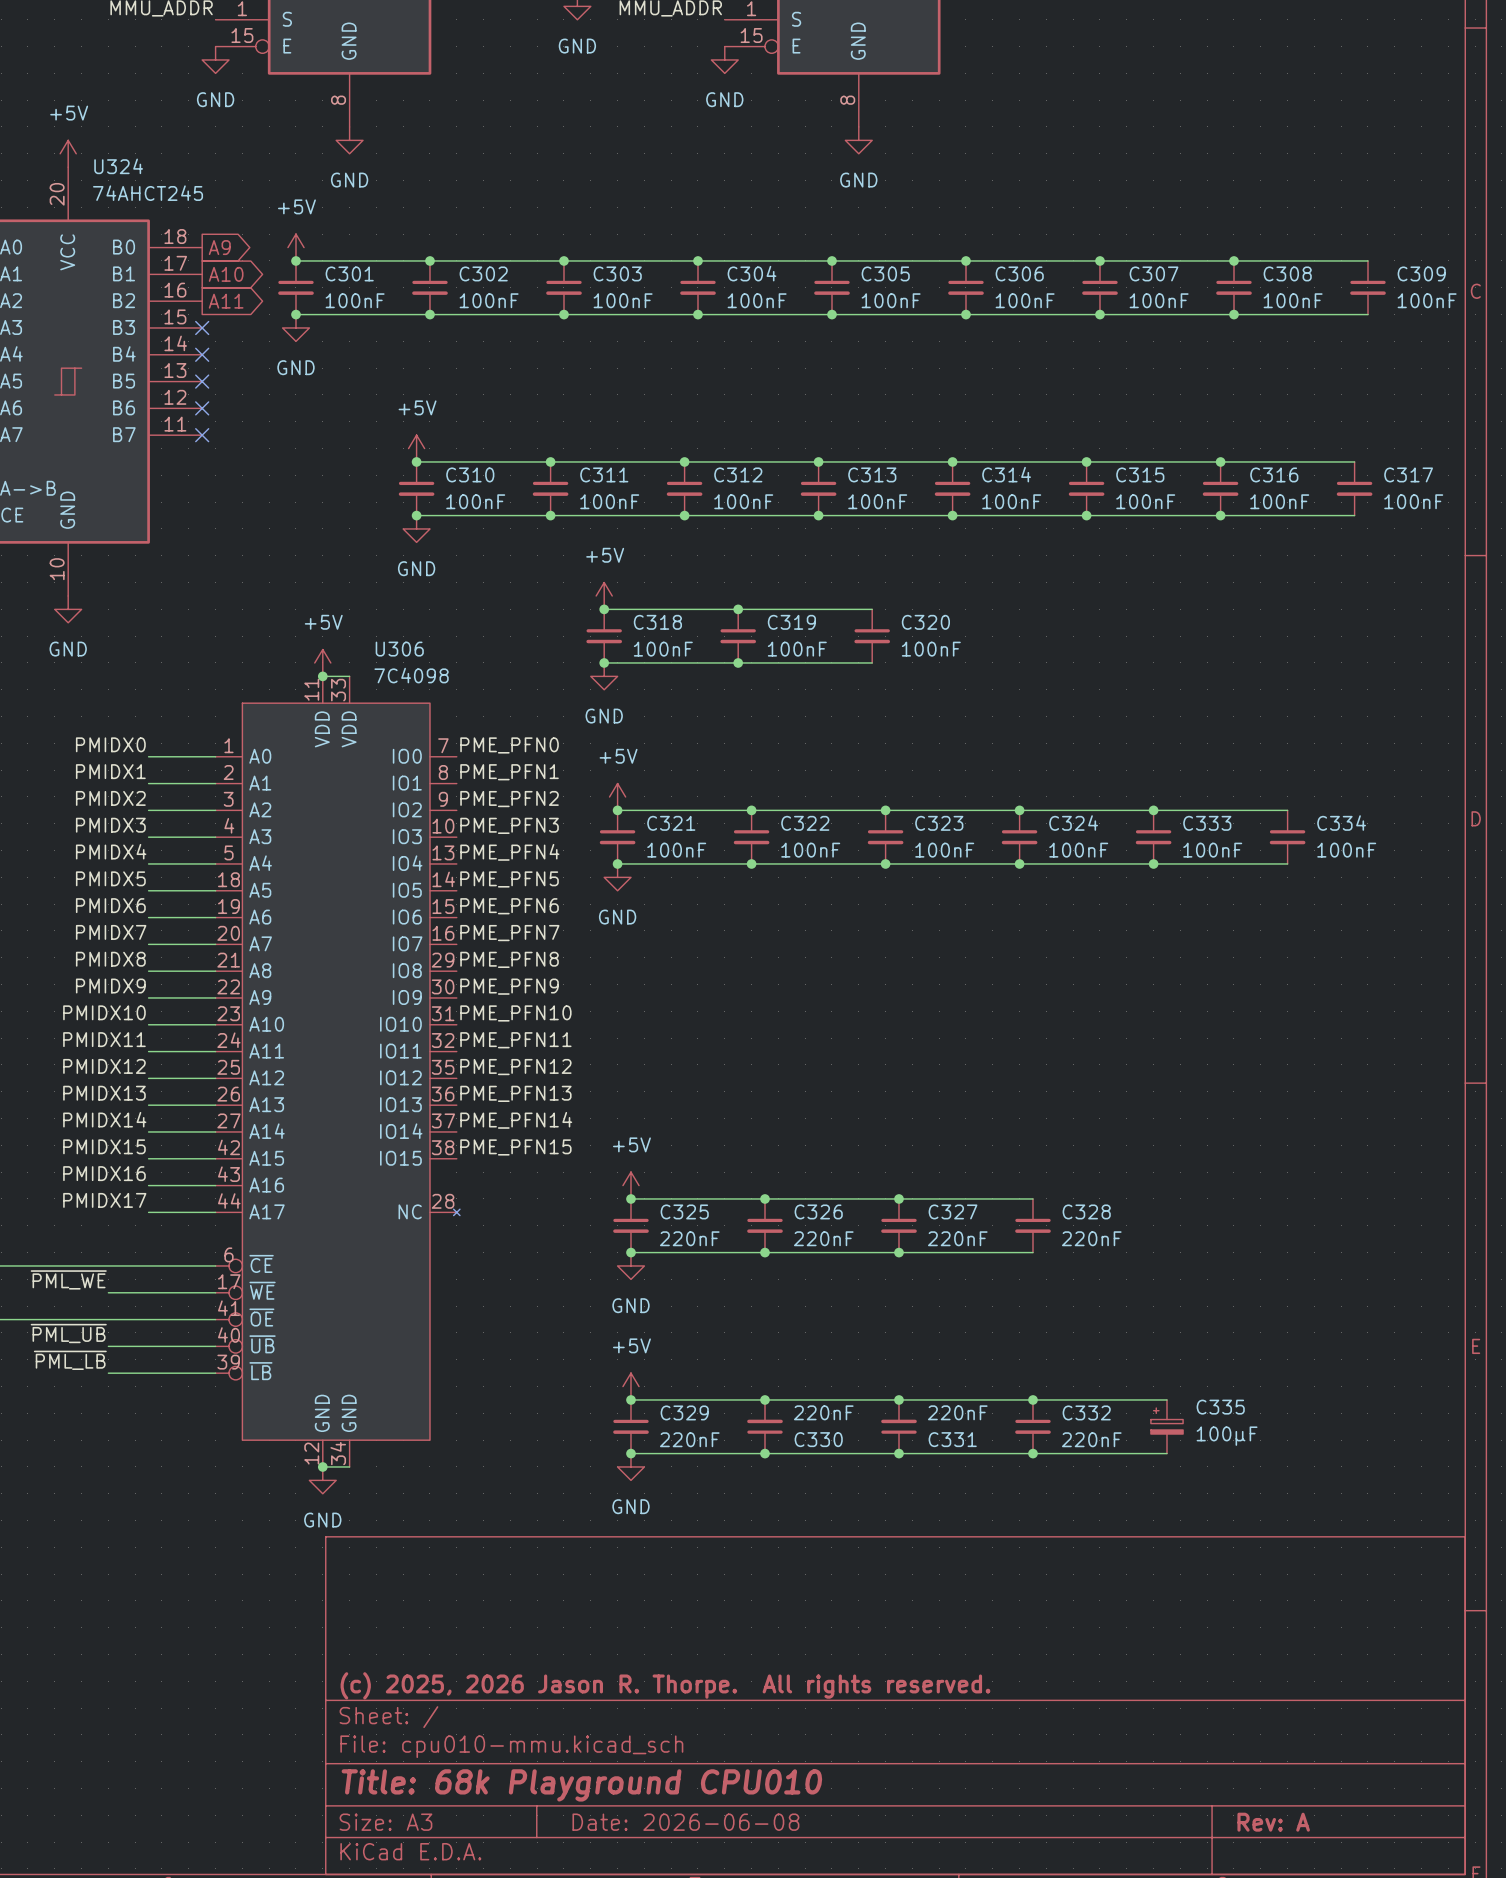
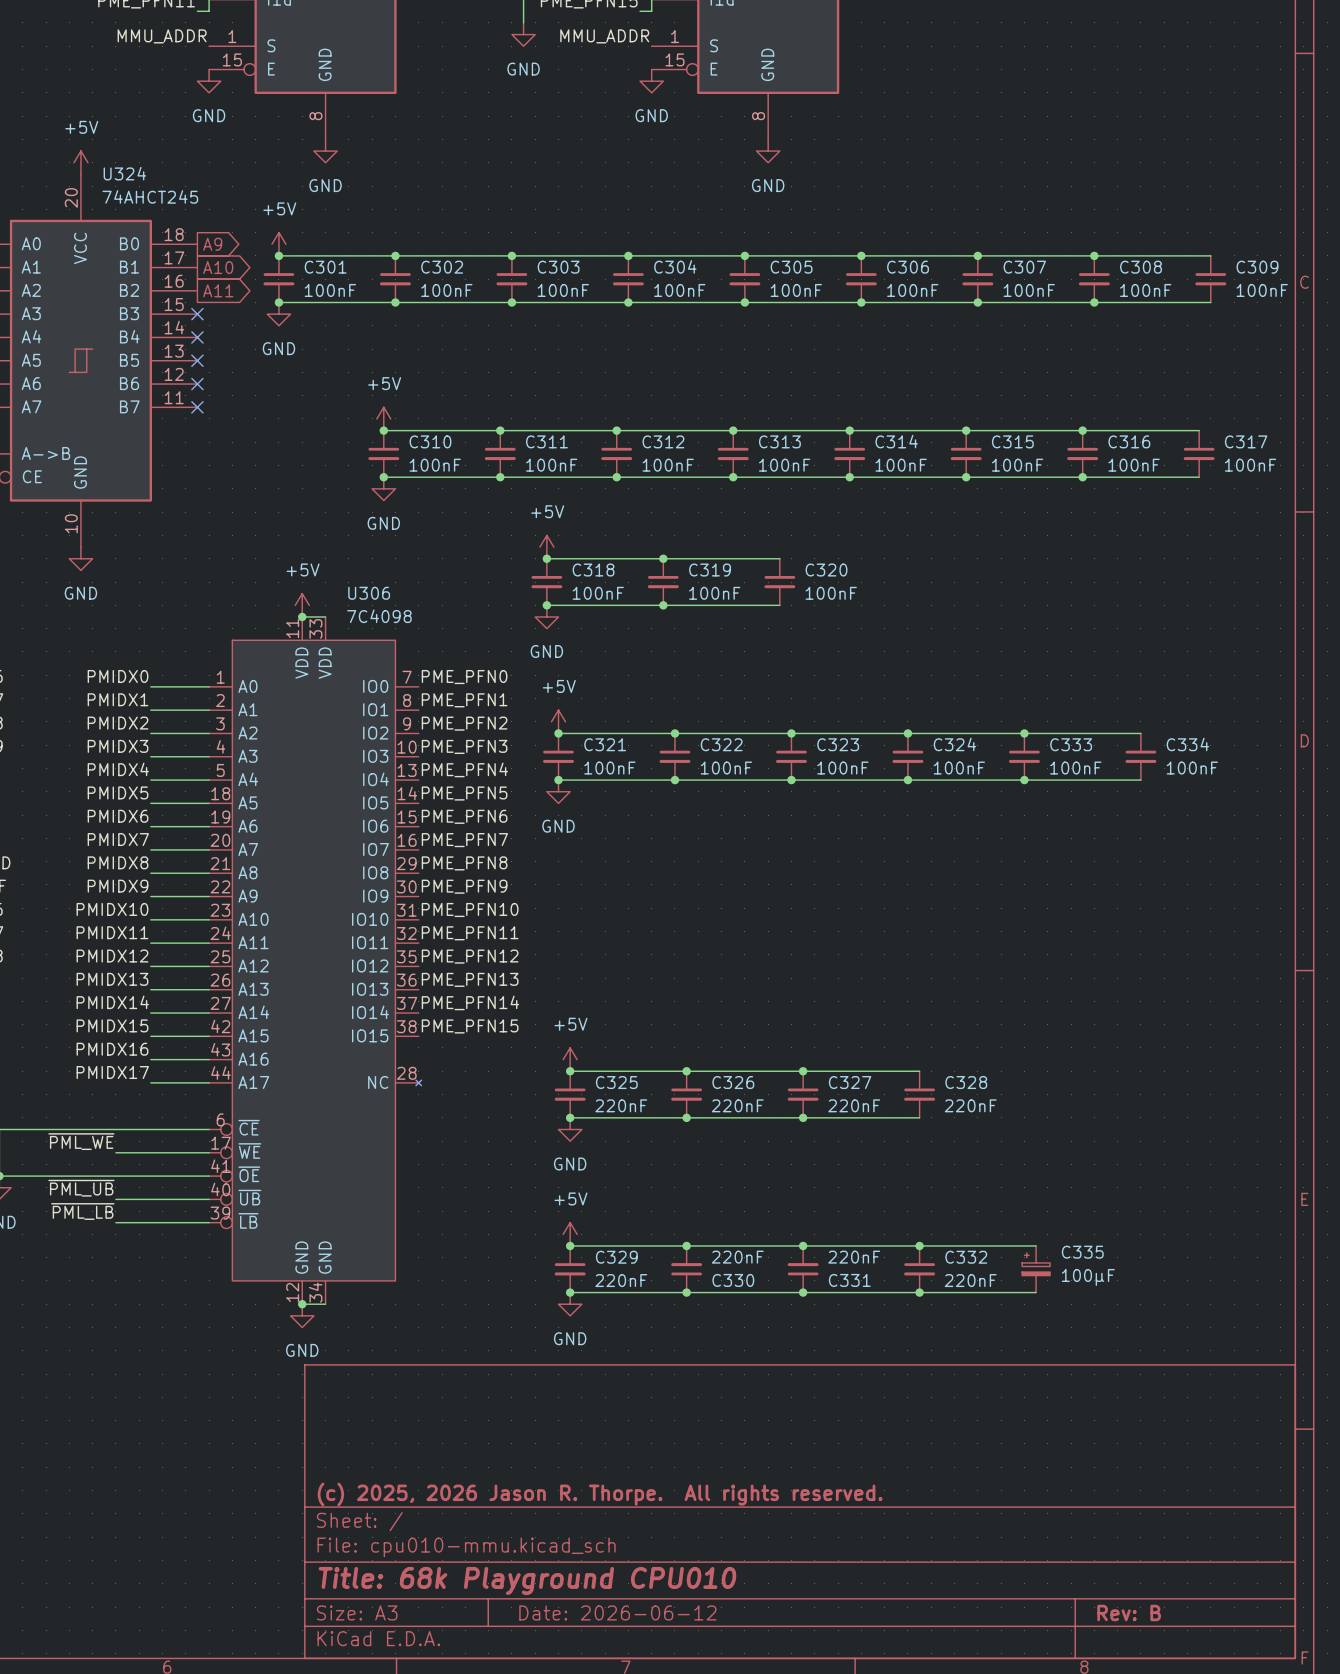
title block: Date: 2026-06-08 (685, 1822) -> Date: 2026-06-12 (617, 1612)
title block: Rev: A (1273, 1822) -> Rev: B (1129, 1612)

